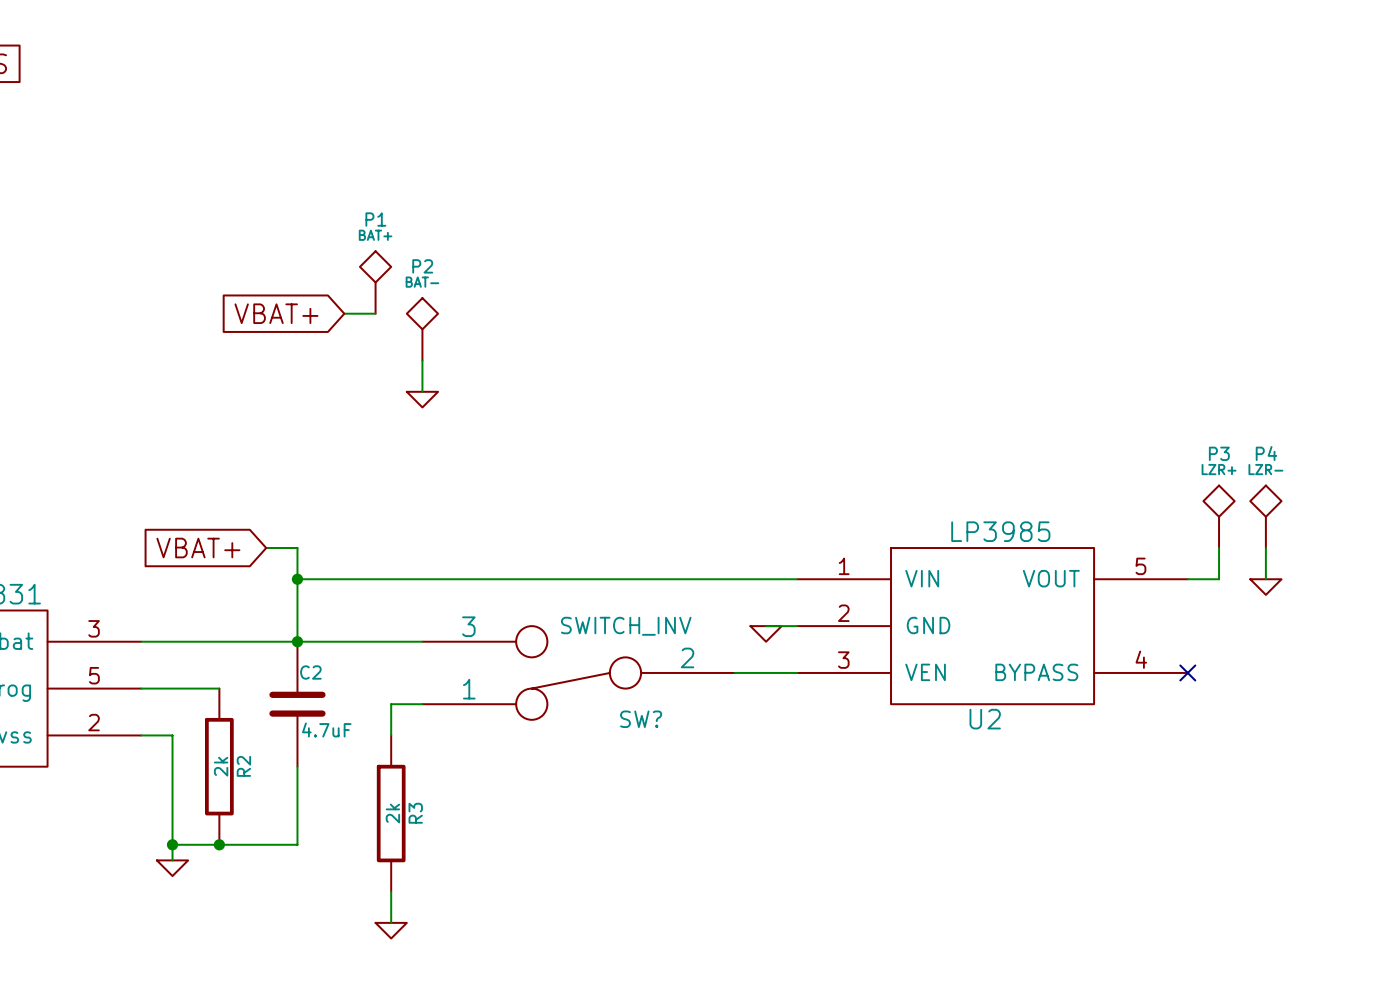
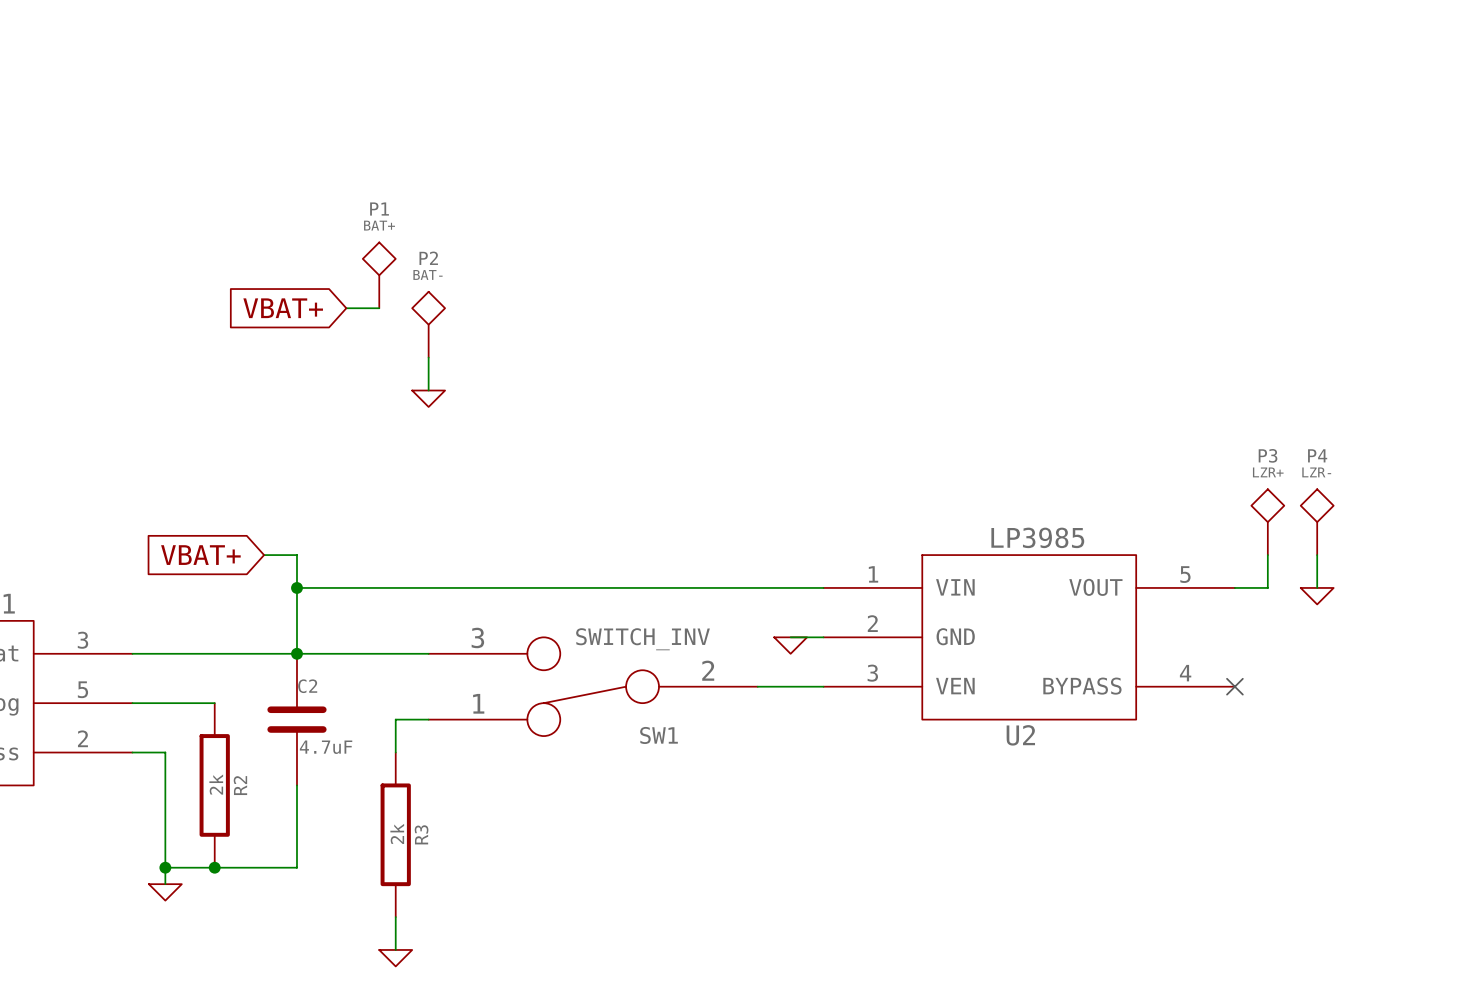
SW? name: SW? (641, 719) -> SW1 (659, 735)

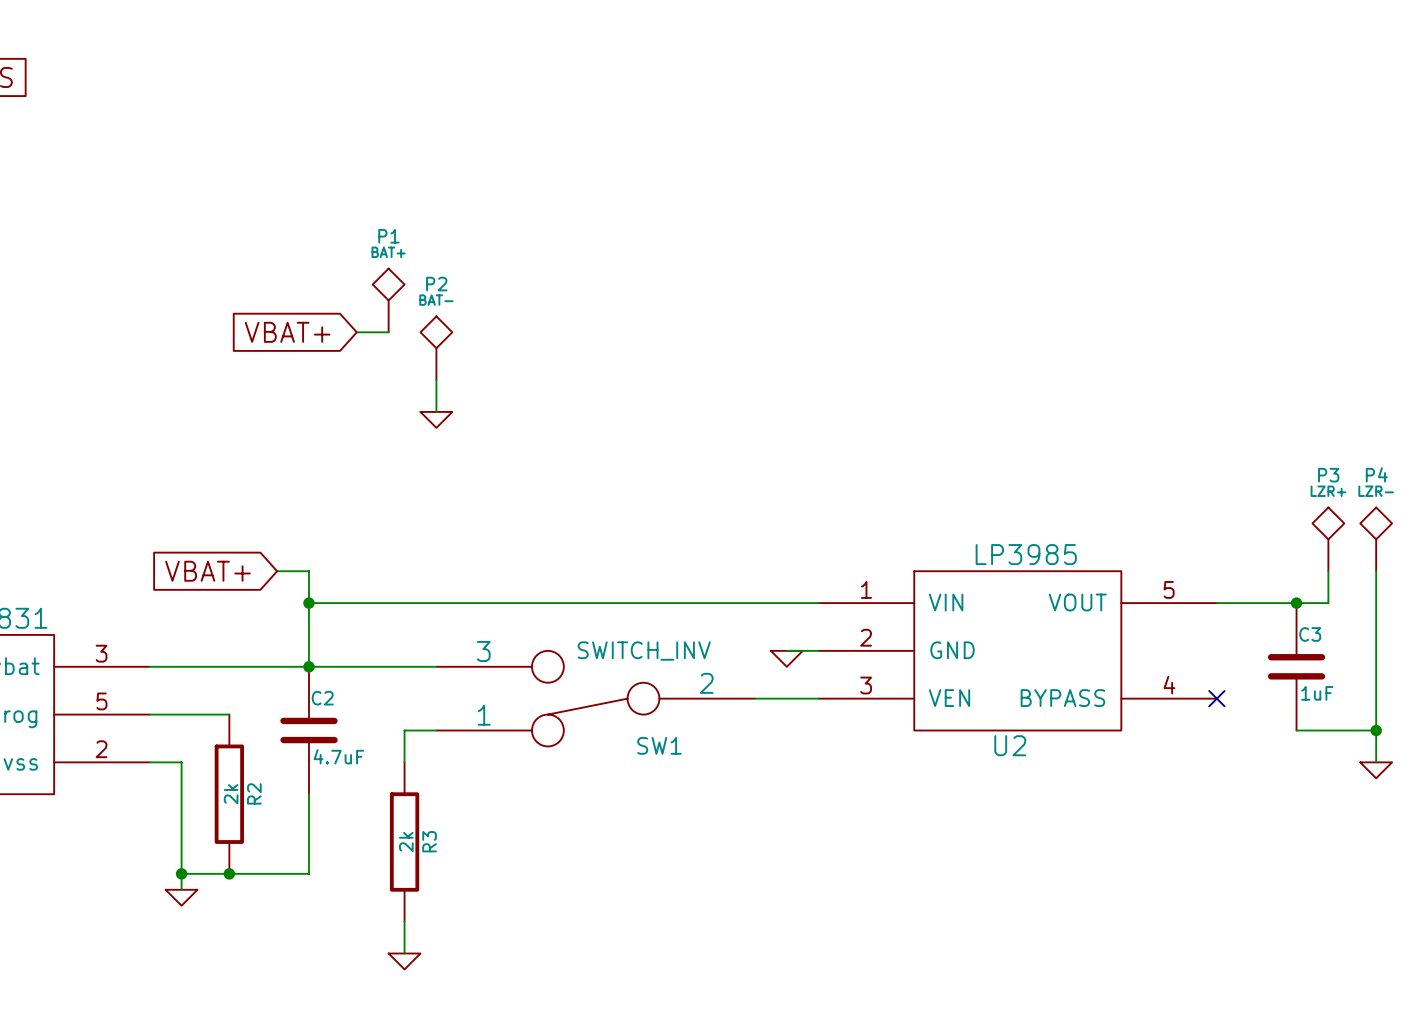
P3 position: (1267, 522) -> (1328, 539)
P4 position: (1317, 522) -> (1376, 539)
wire: (1267, 555) (1267, 587) -> (1328, 571) (1328, 603) (1248, 603)
wire: (1317, 555) (1317, 587) -> none
wire: none -> (1376, 571) (1376, 762)
junction: none -> (1296, 603)
power symbol position: (1317, 596) -> (1376, 770)
C3: none -> 1uF (1296, 666)
wire: none -> (1296, 730) (1376, 730)
junction: none -> (1376, 730)

